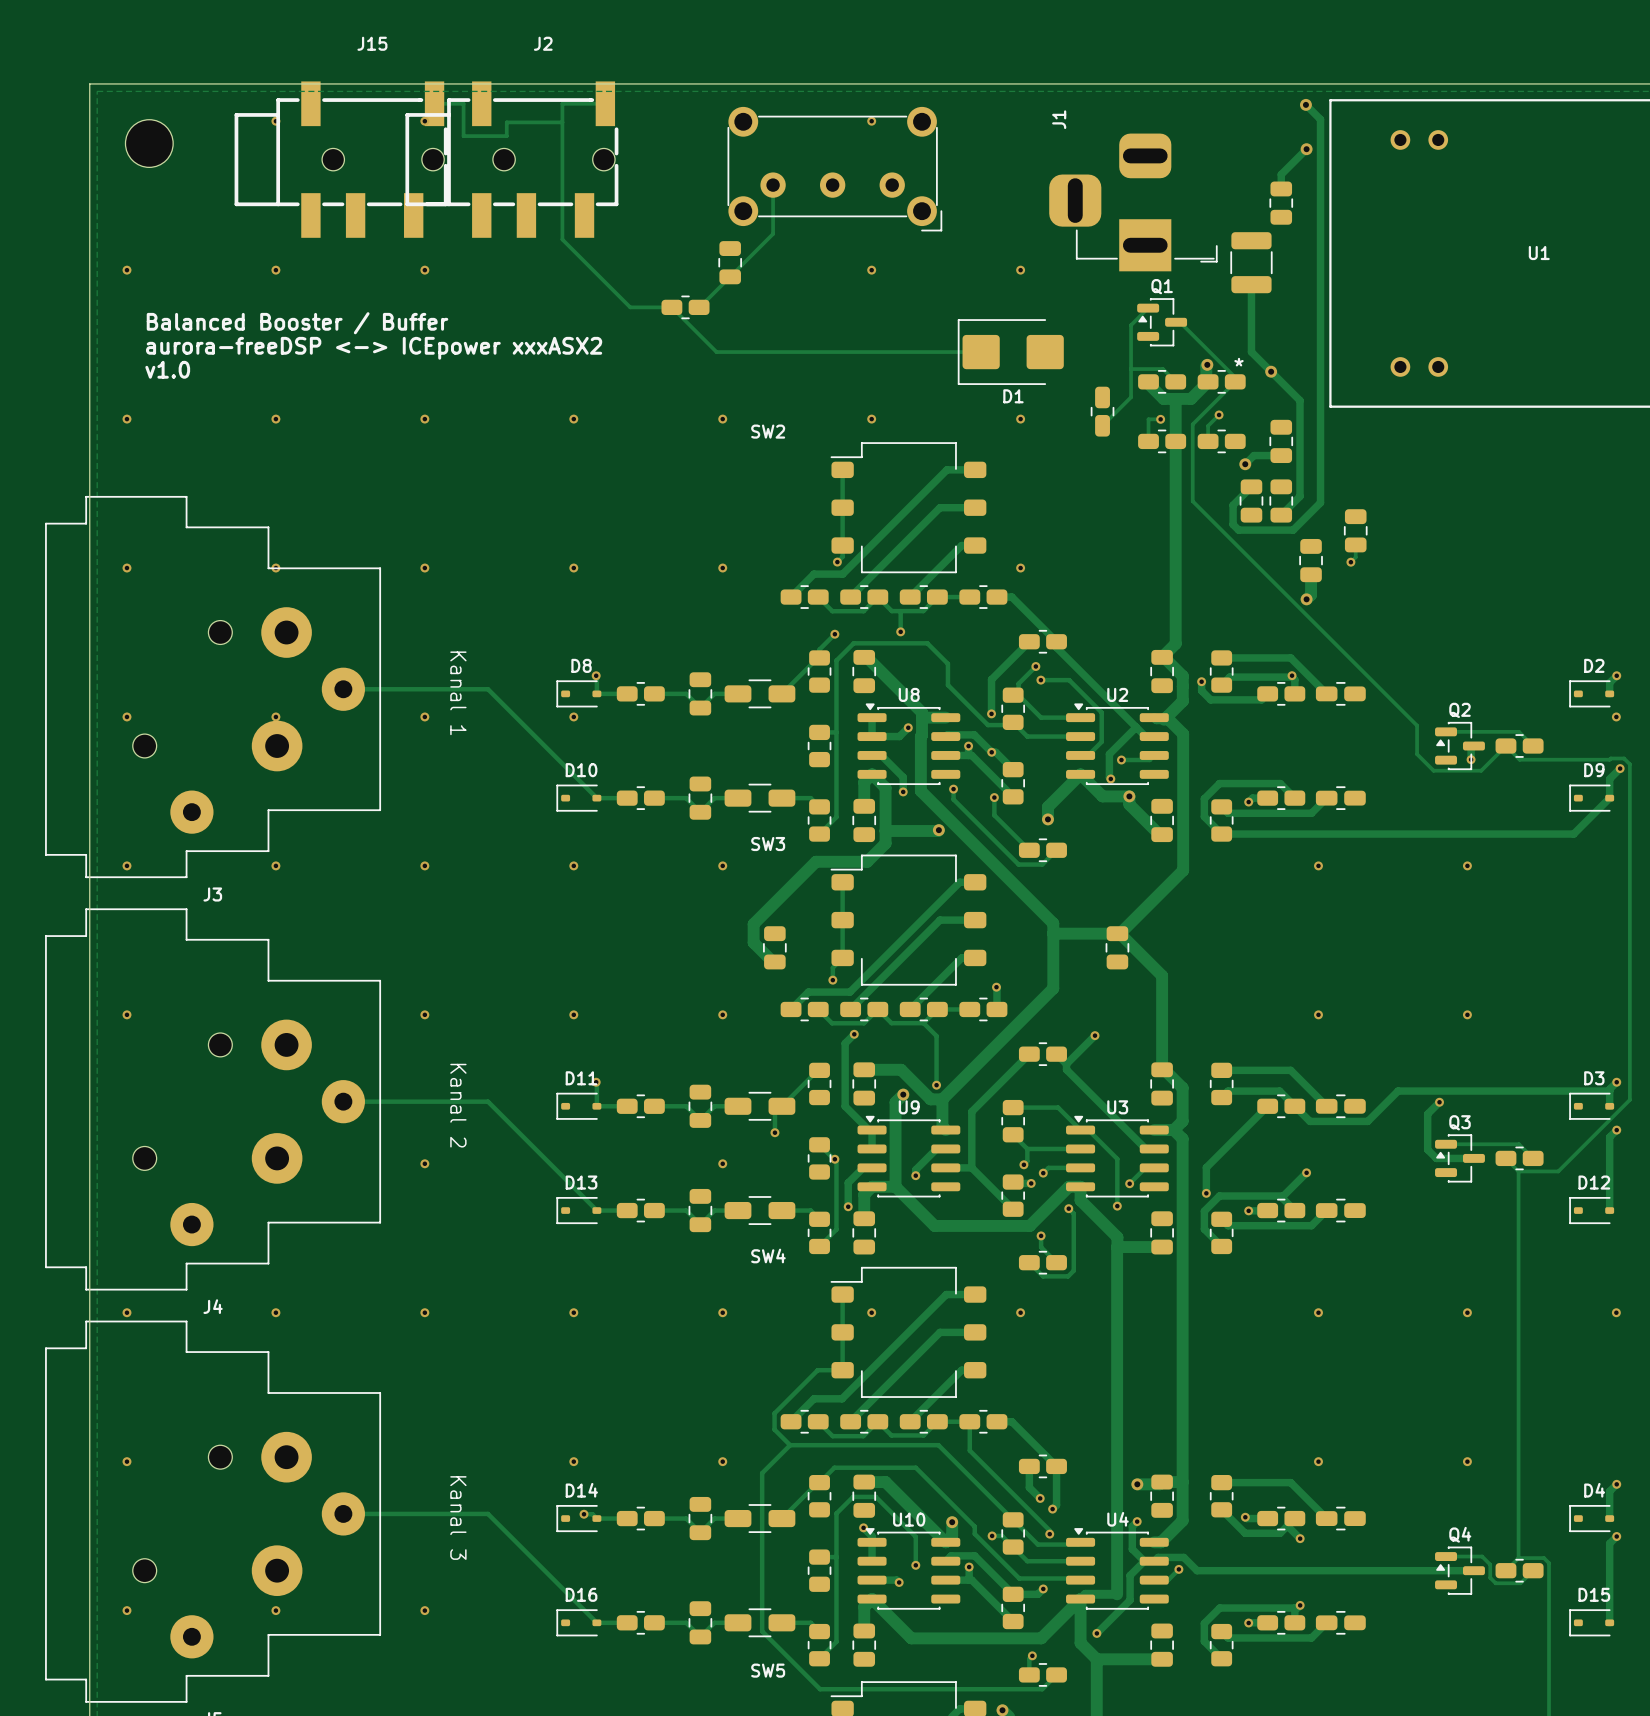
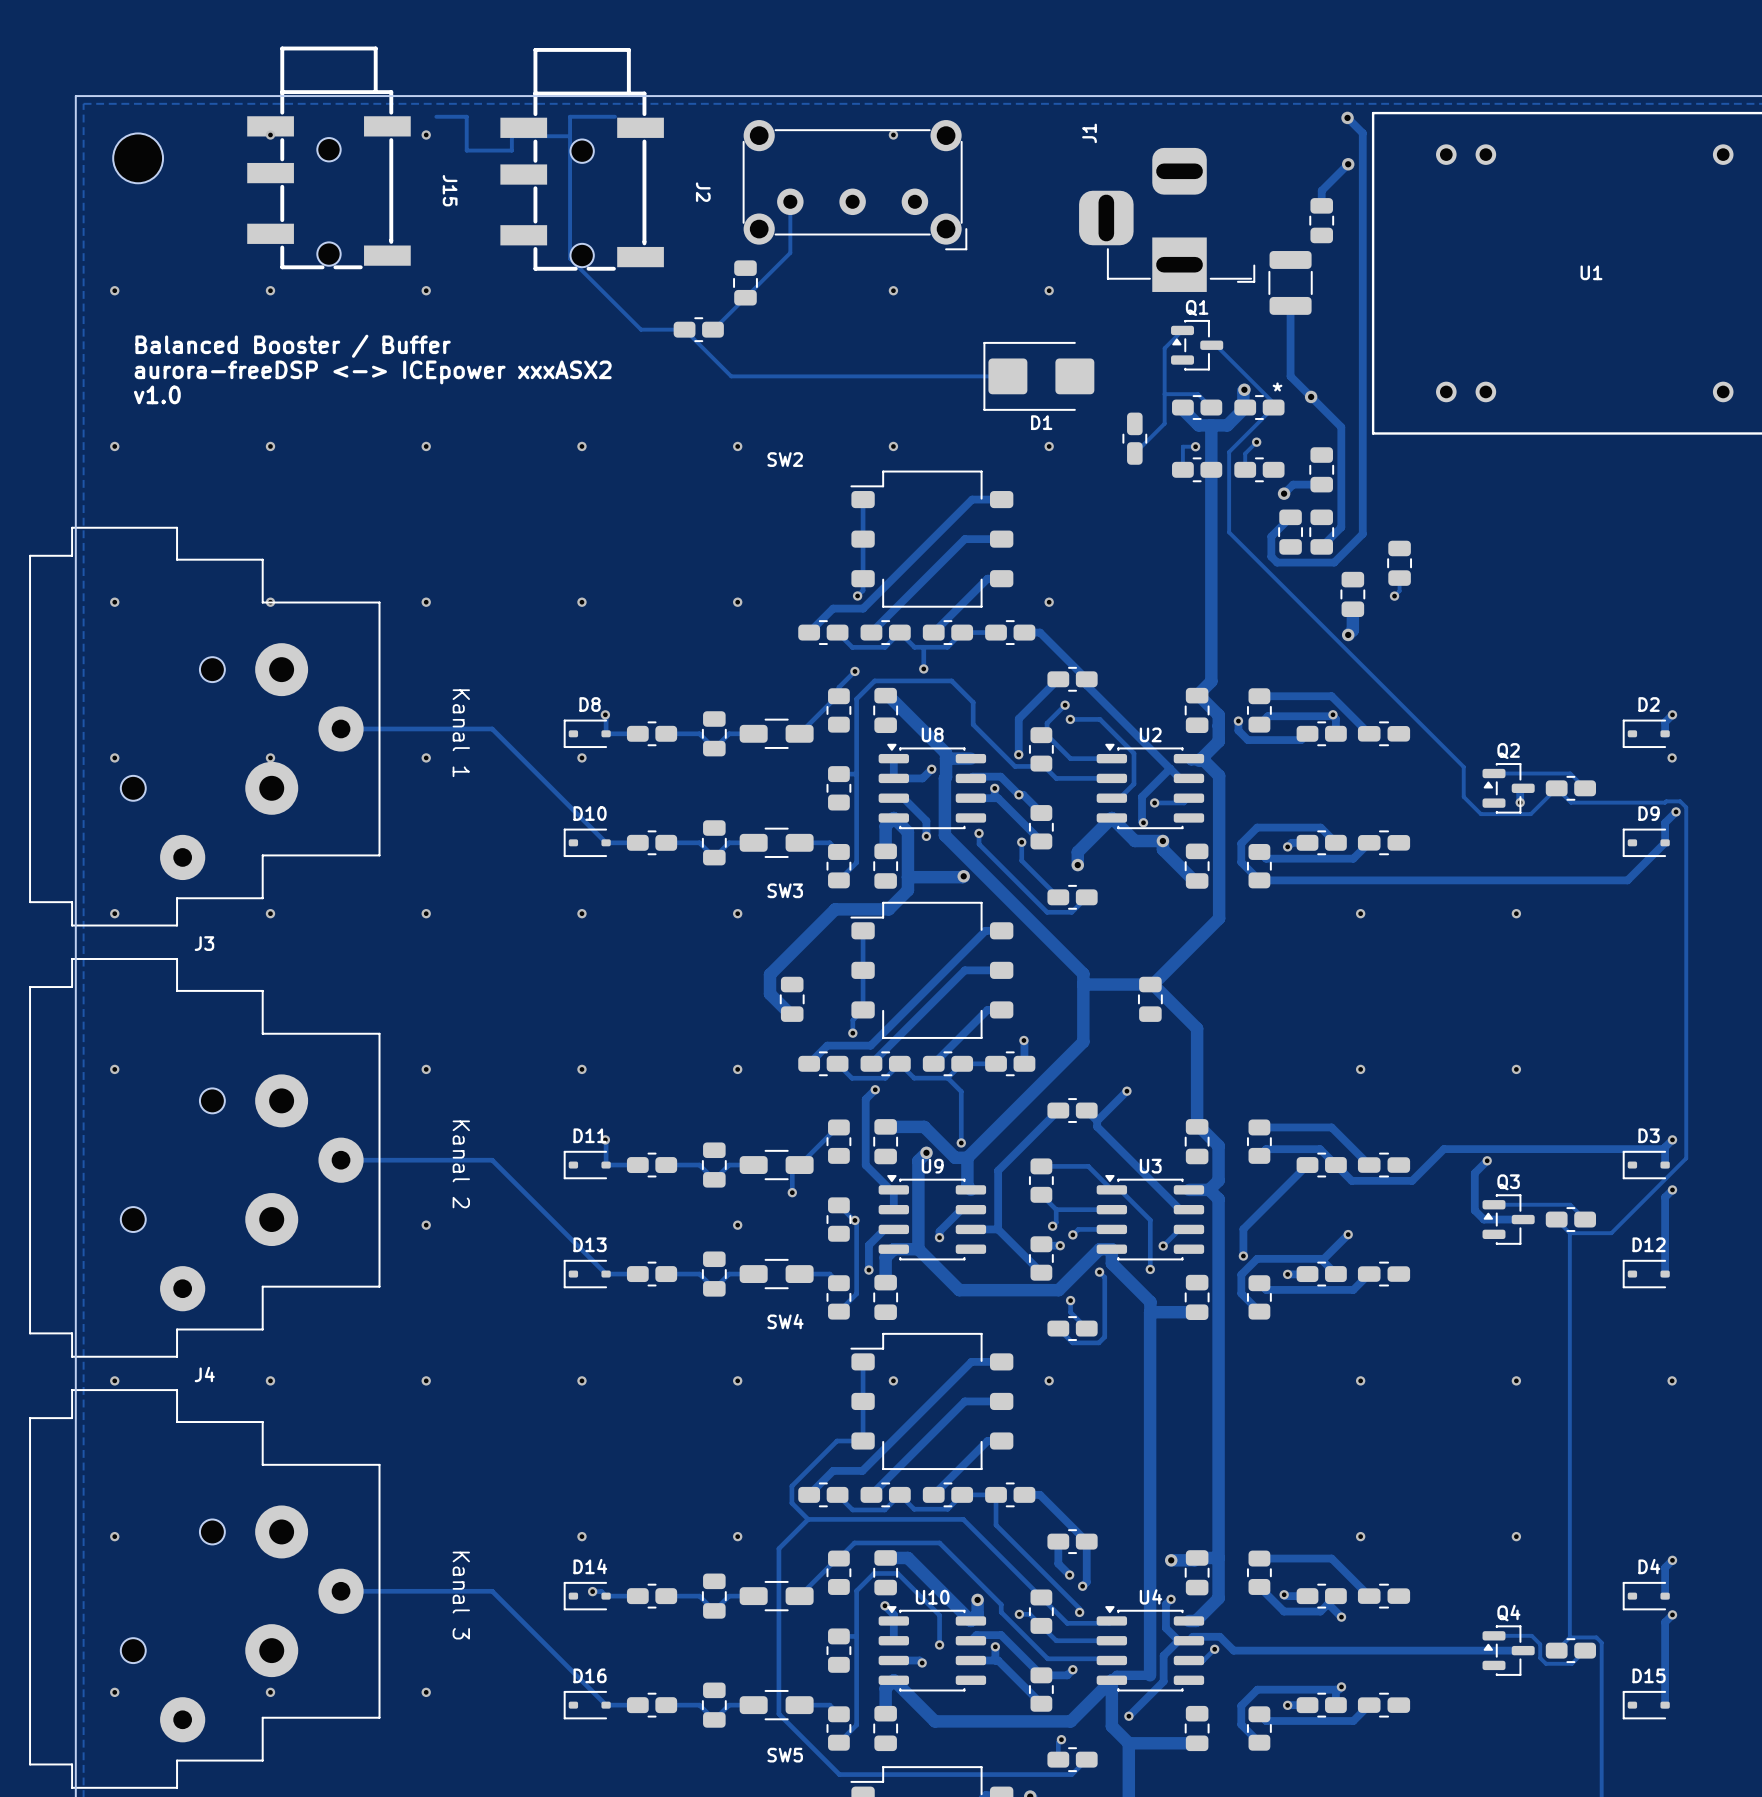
J15 rotation: 0° (341, 159) -> 90° clockwise (328, 157)
J2 rotation: 0° (511, 159) -> 90° clockwise (582, 159)

